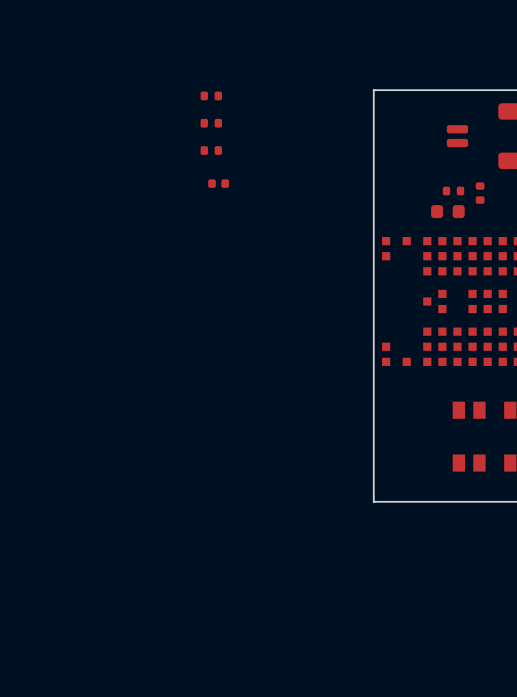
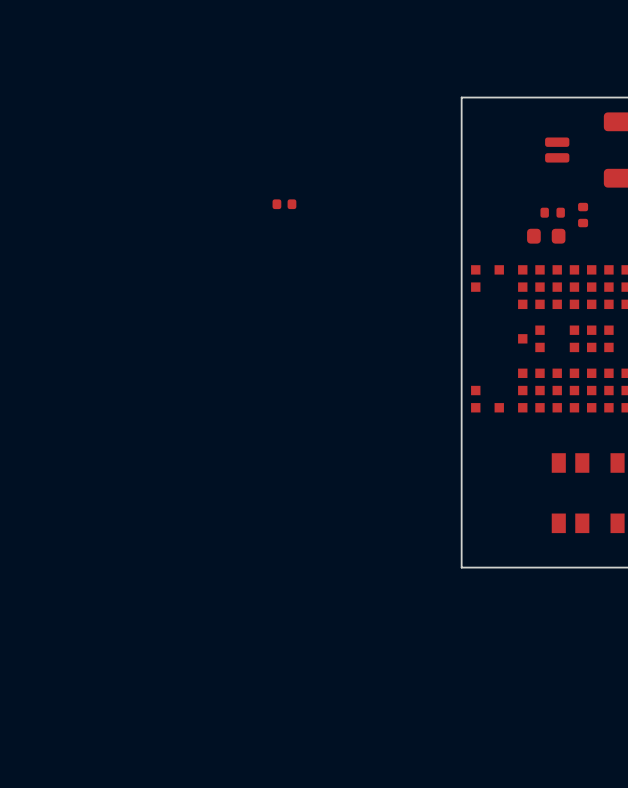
part: (211, 95) -> none
part: (211, 123) -> none
part: (211, 150) -> none

